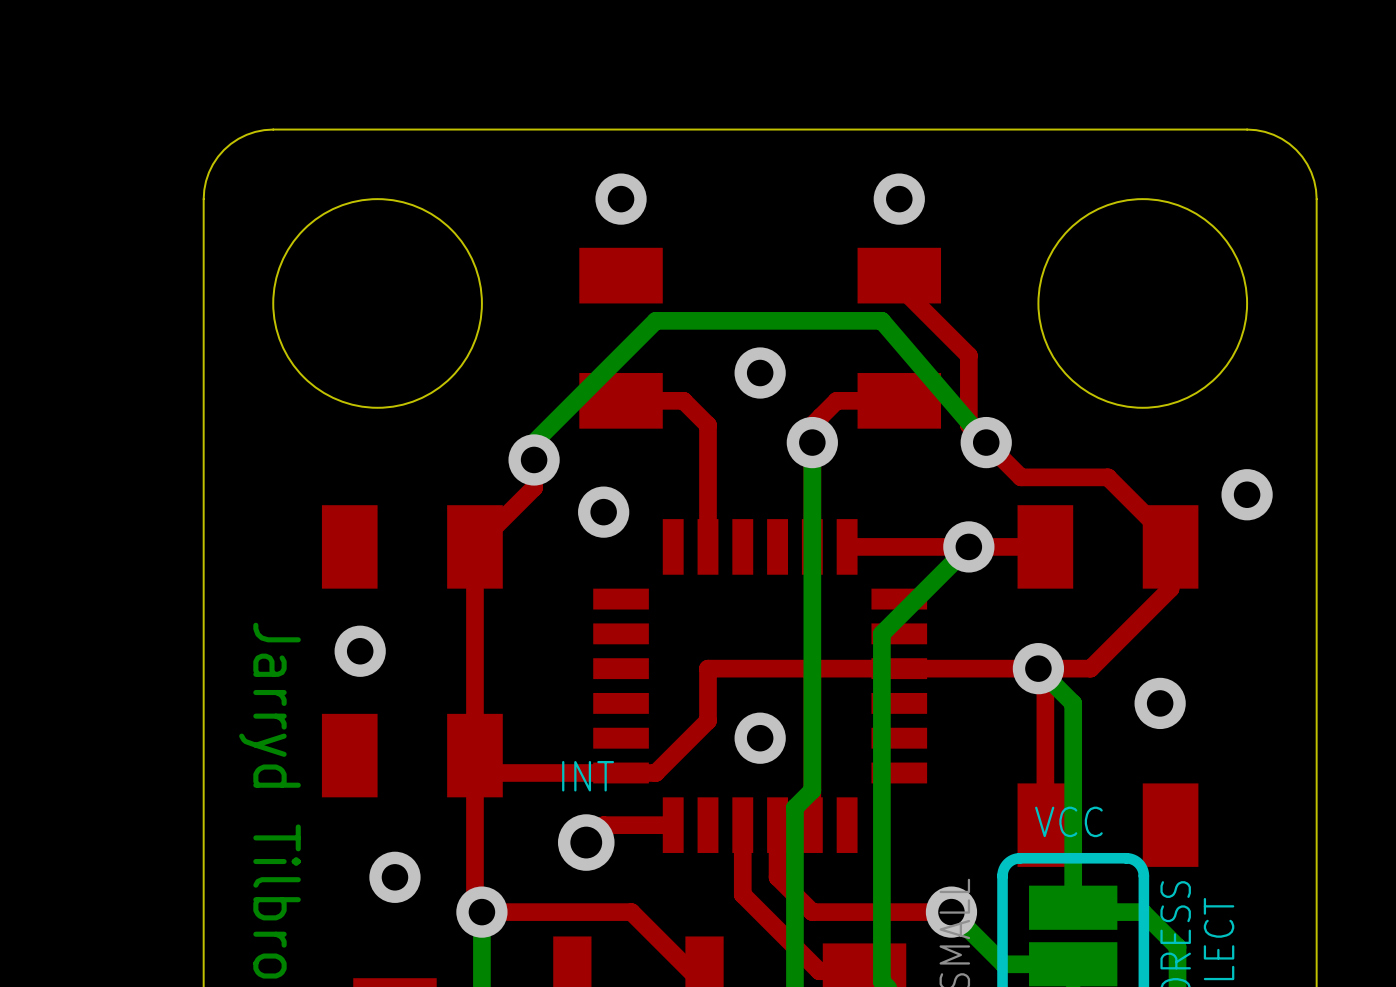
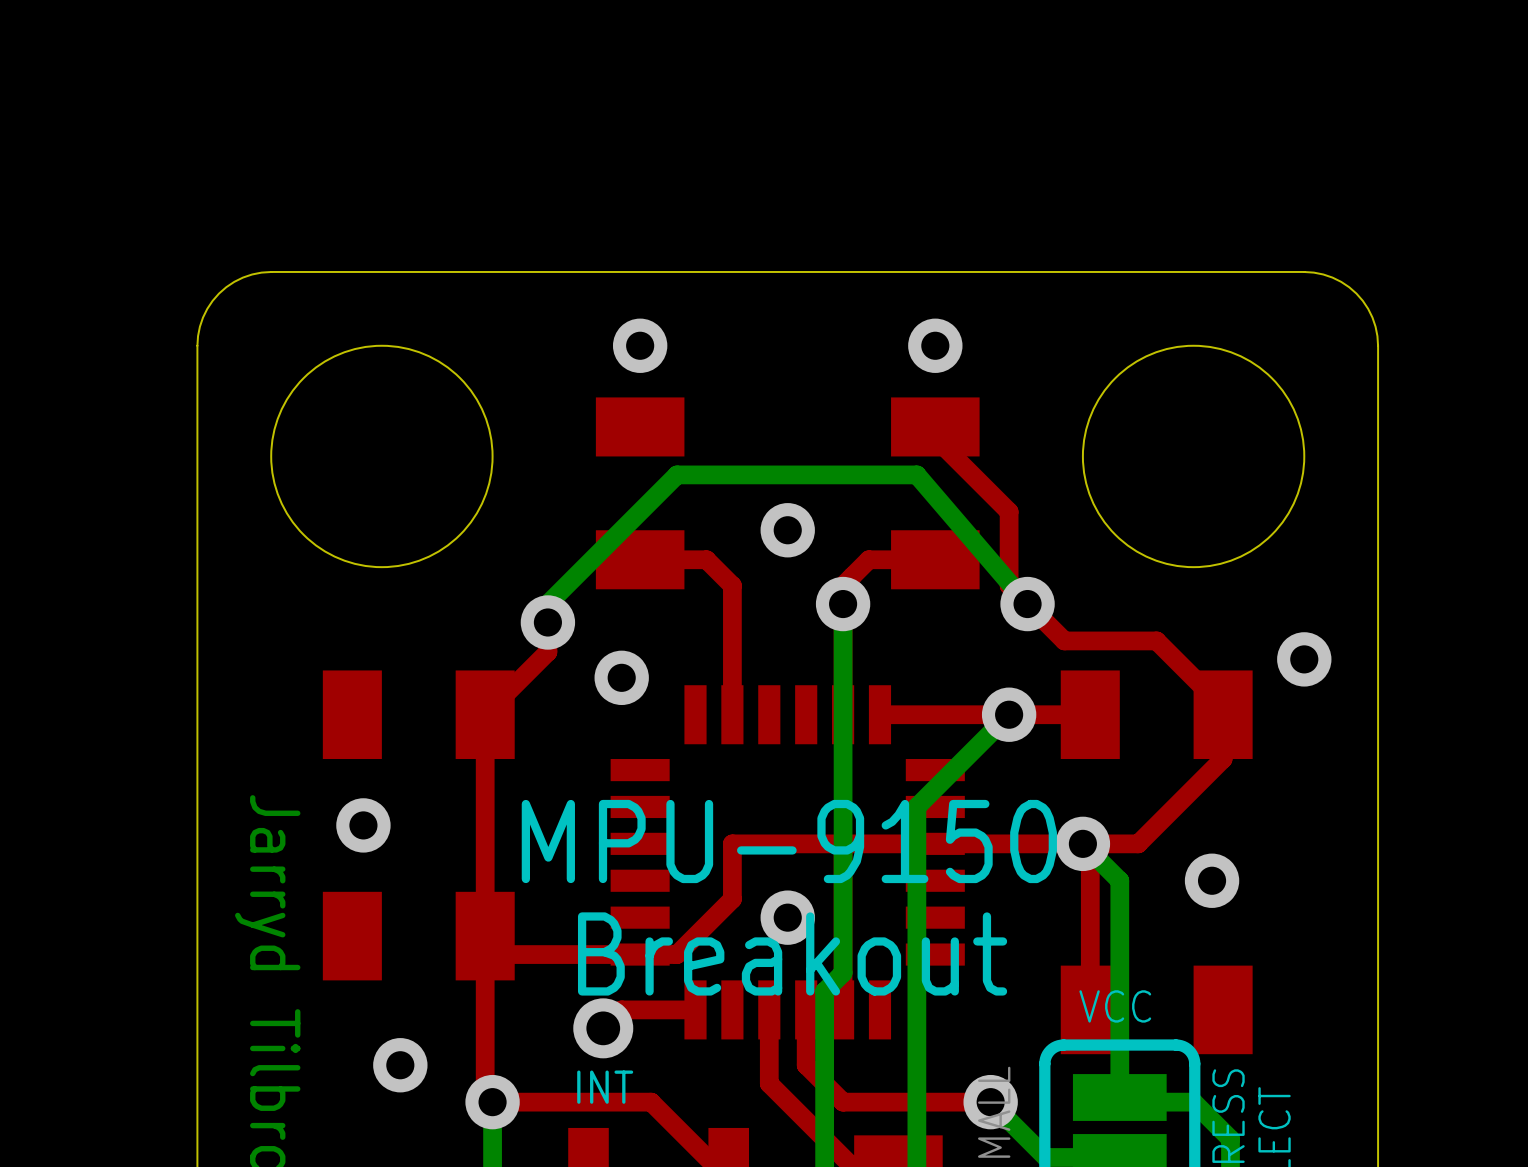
text: none -> MPU-9150 (789, 841)
text: none -> Breakout (792, 953)
text position: INT (588, 776) -> INT (605, 1087)

